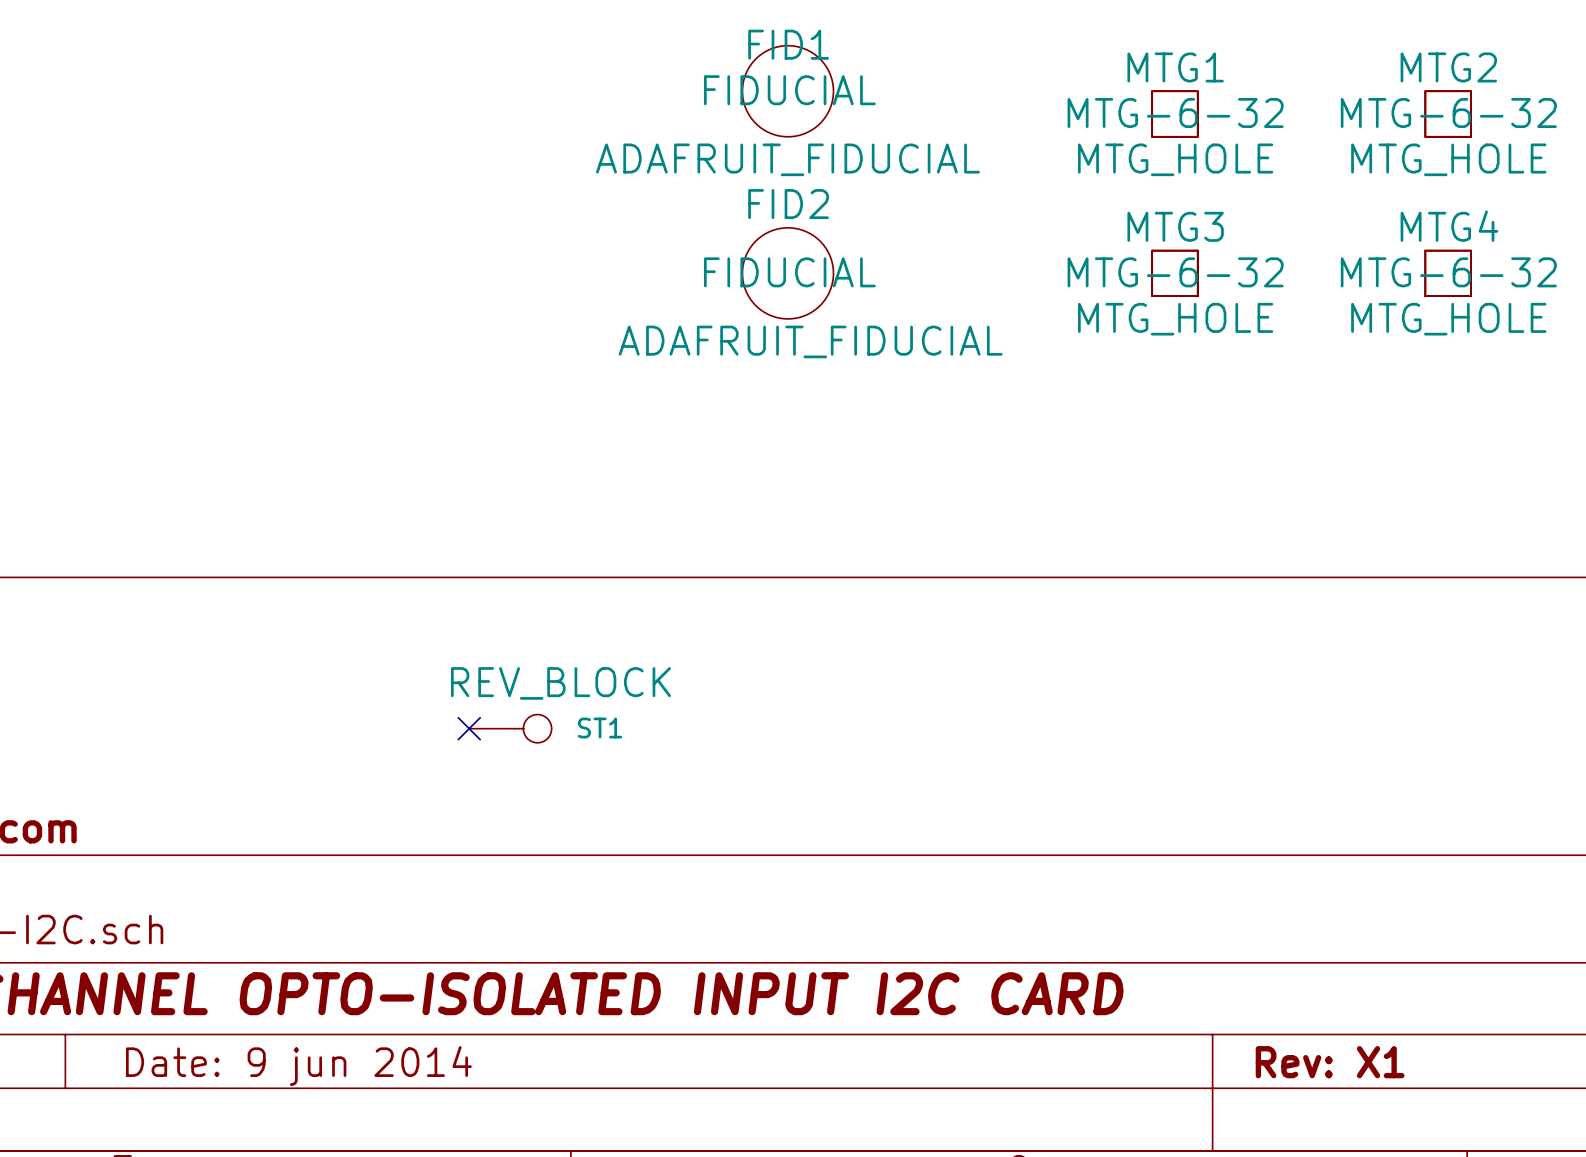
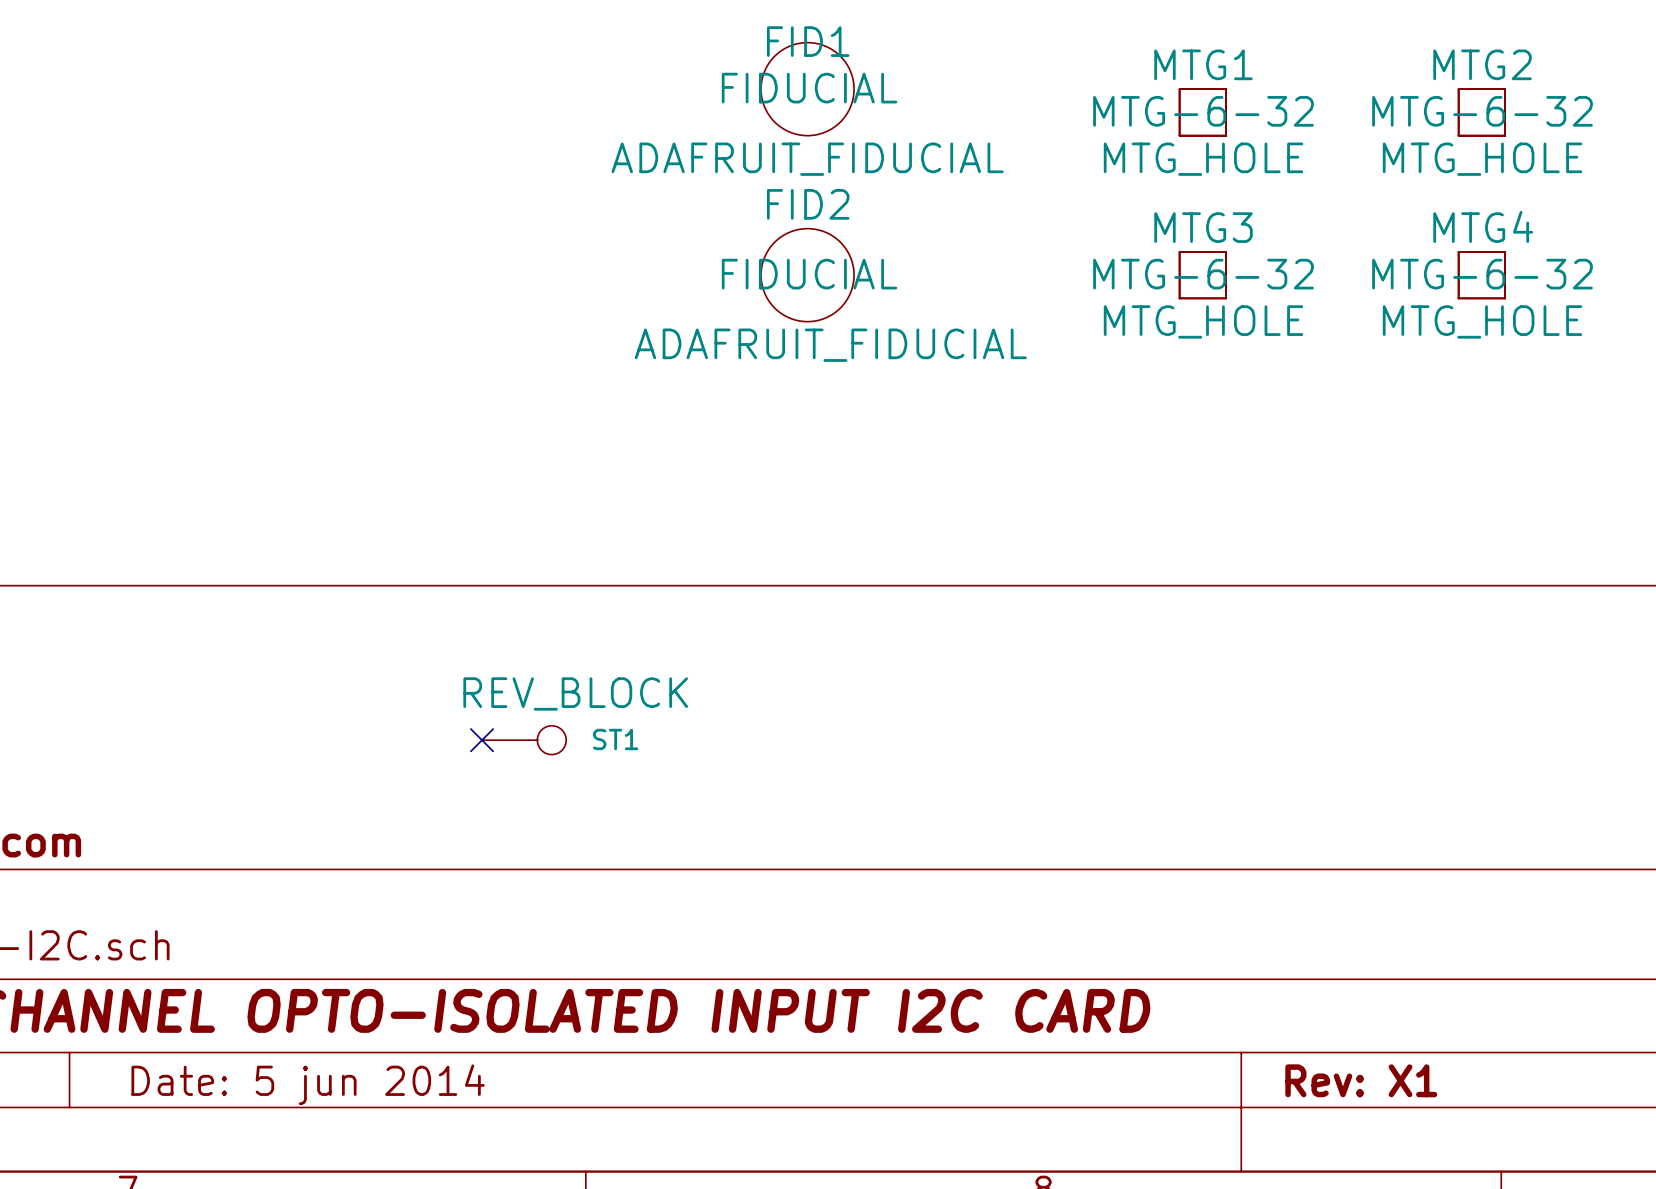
title block: Date: 9 jun 2014 (298, 1066) -> Date: 5 jun 2014 (308, 1084)

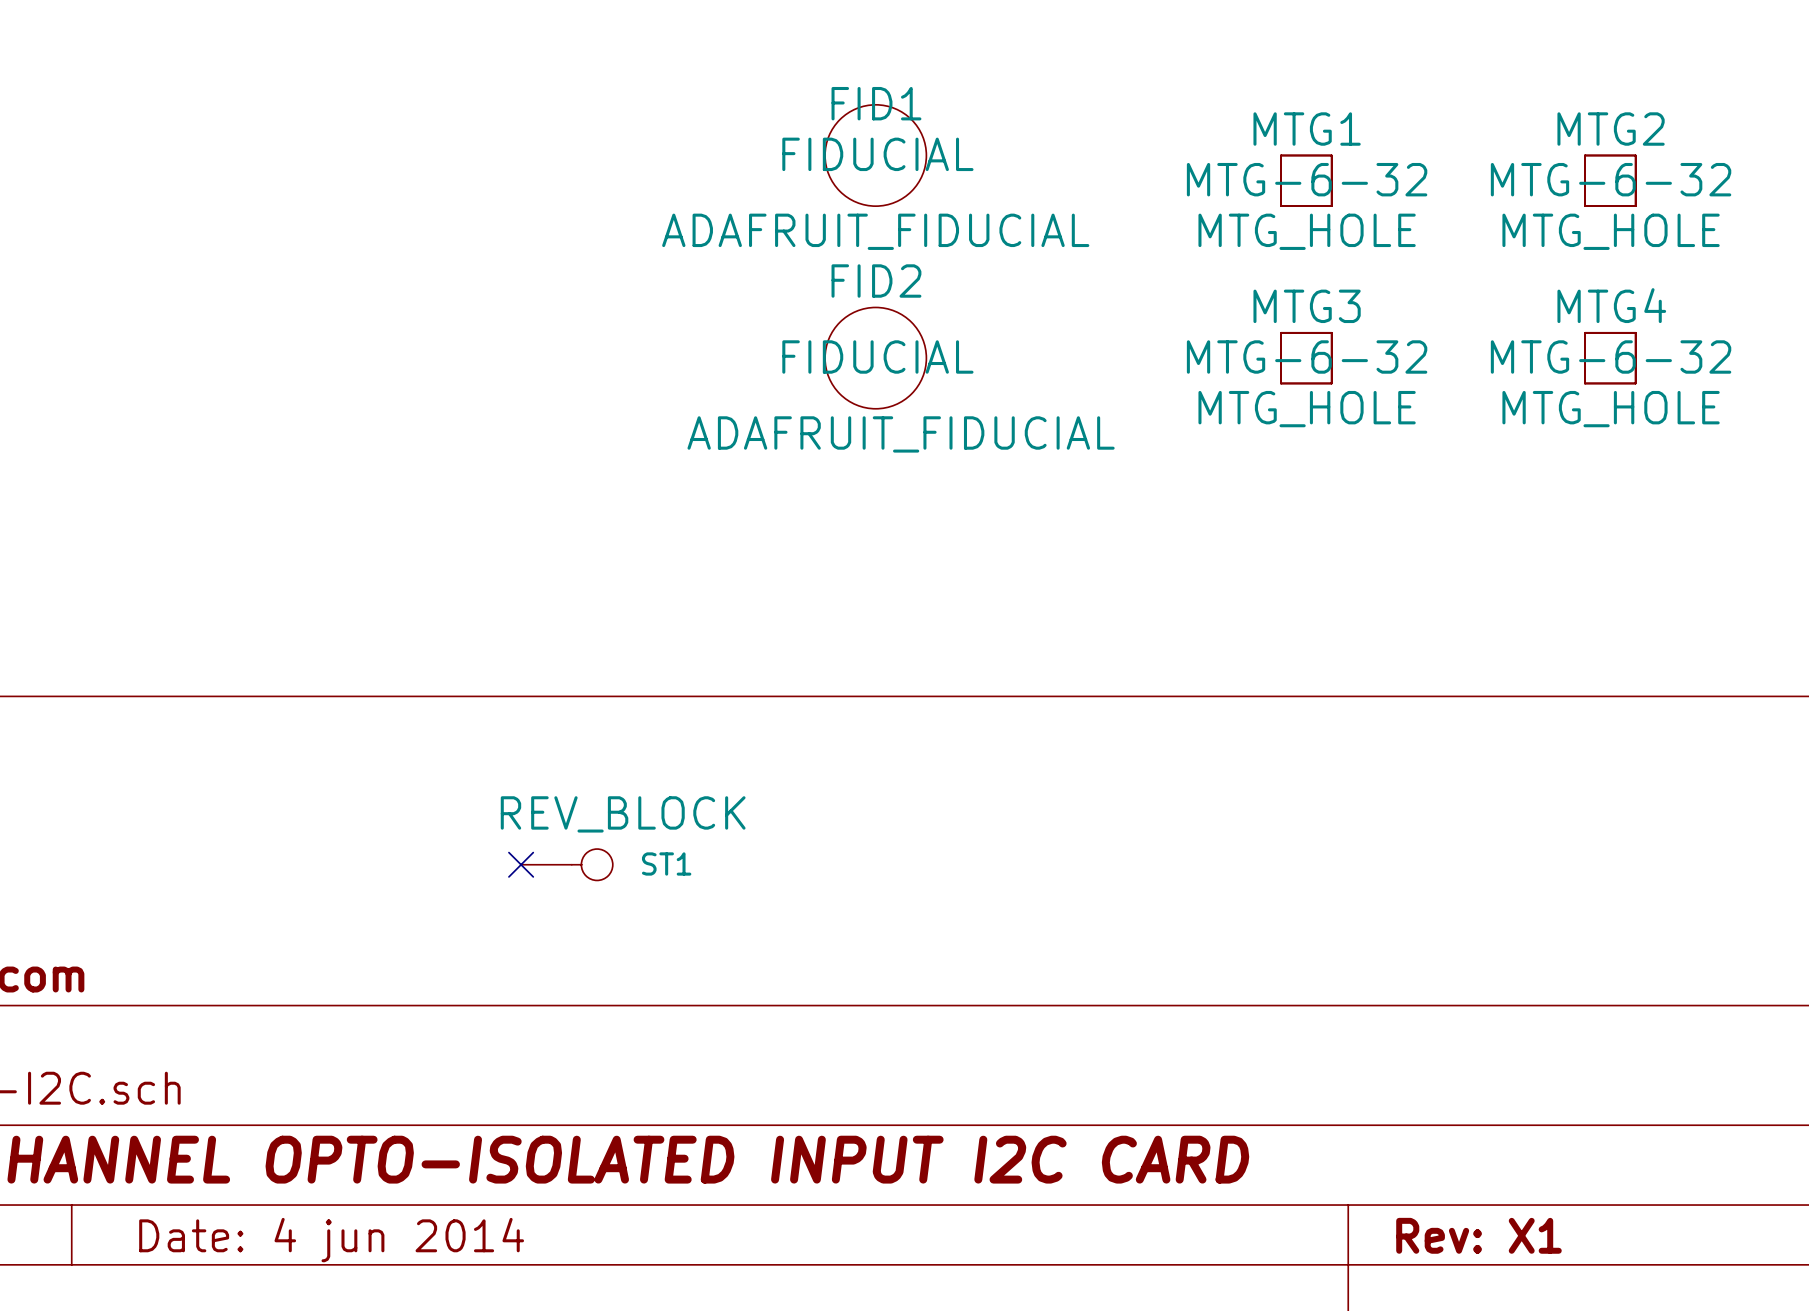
title block: Date: 5 jun 2014 (308, 1084) -> Date: 4 jun 2014 (331, 1240)

